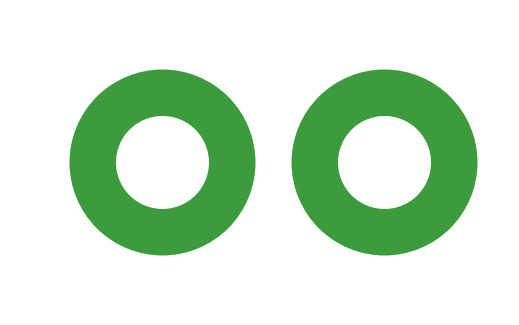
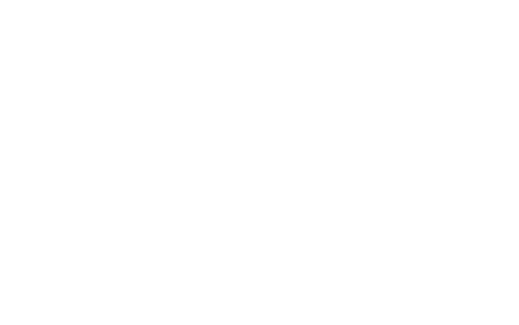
part: (162, 162) -> none
part: (384, 162) -> none

